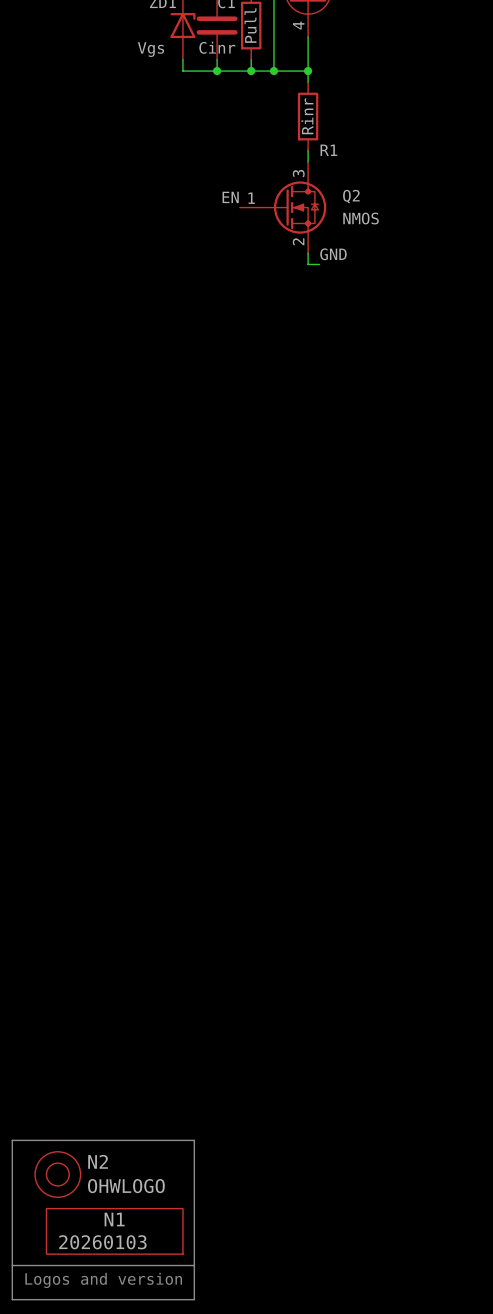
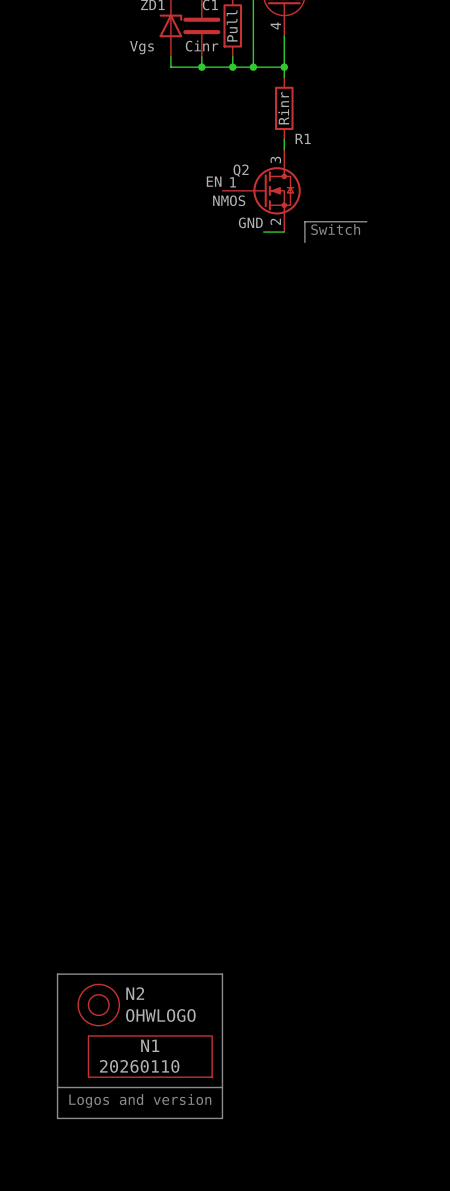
Q2 name position: Q2 (351, 196) -> Q2 (241, 170)
Q2 value position: NMOS (361, 218) -> NMOS (229, 200)
line: none -> (366, 221) (304, 221) (304, 242)
text: none -> Switch (335, 229)
wire: (308, 253) (308, 264) (319, 264) -> (284, 232) (263, 232)
label position: GND (333, 254) -> GND (250, 222)
line: (12, 1140) (12, 1299) (194, 1299) (194, 1140) (12, 1140) -> (57, 974) (57, 1118) (222, 1118) (222, 974) (57, 974)
N2 position: (57, 1174) -> (98, 1005)
N1 position: (114, 1231) -> (150, 1056)
N1 value: 20260103 (102, 1242) -> 20260110 (139, 1066)
line: (12, 1265) (194, 1265) -> (57, 1087) (222, 1087)
text position: Logos and version (103, 1280) -> Logos and version (140, 1100)

